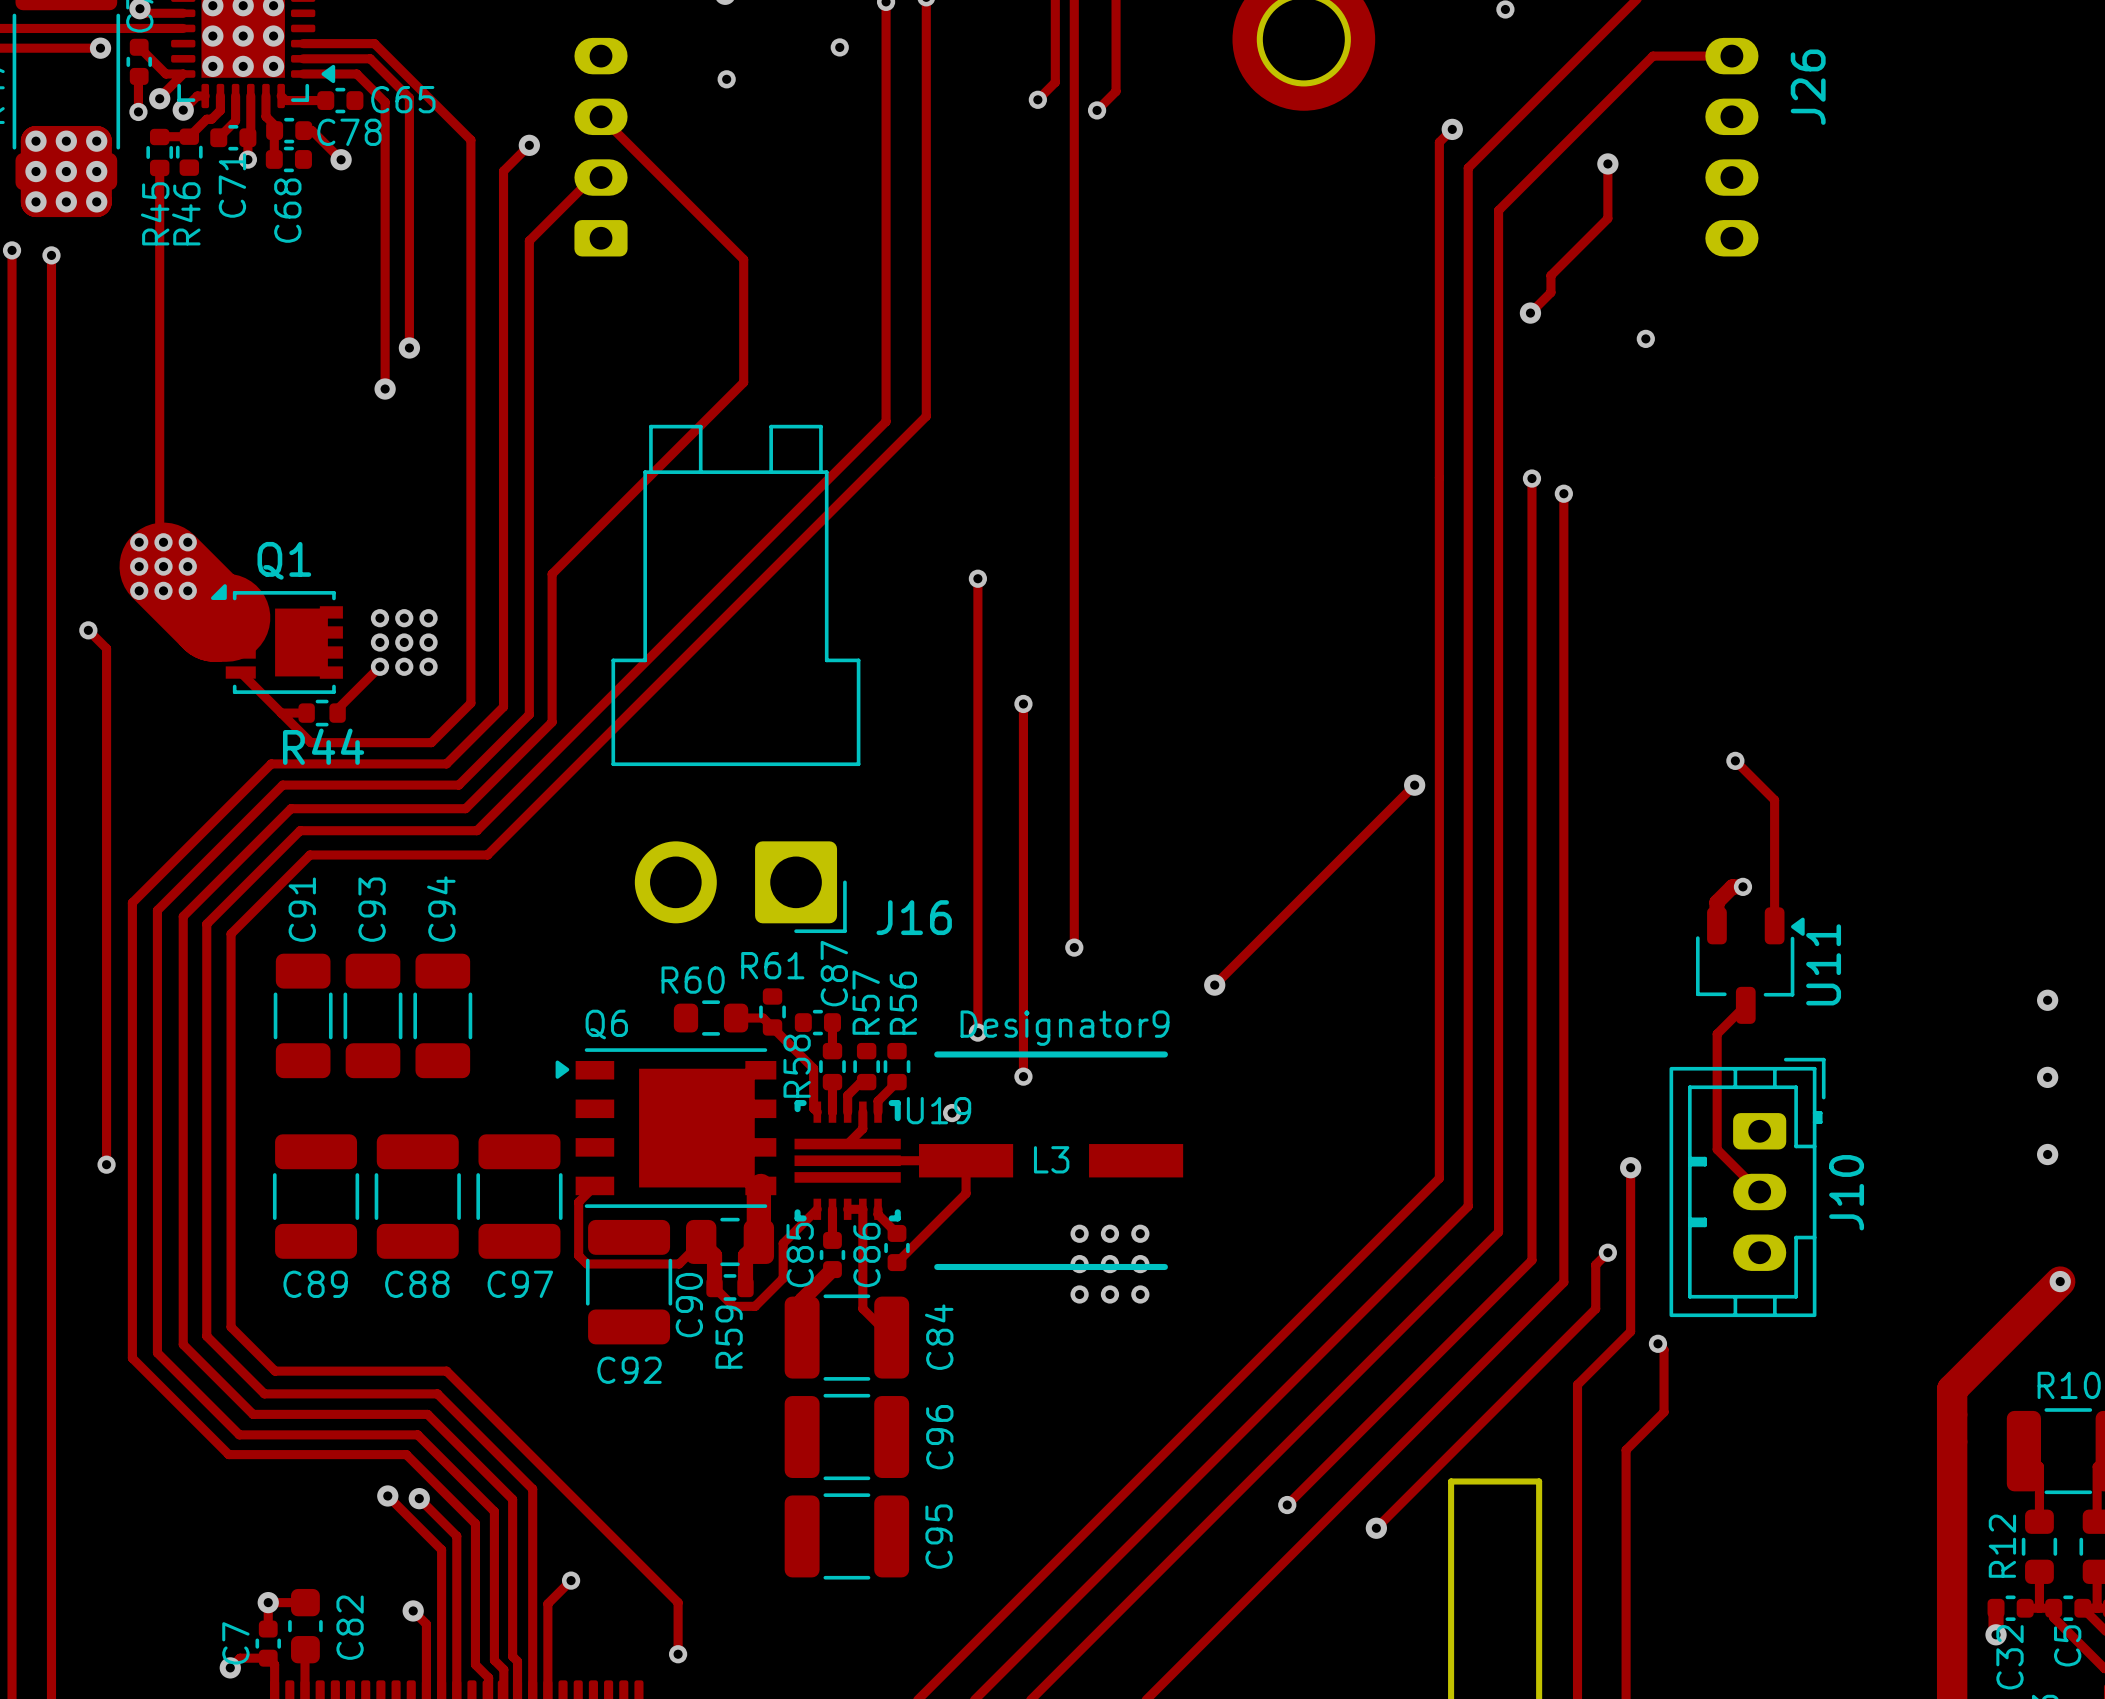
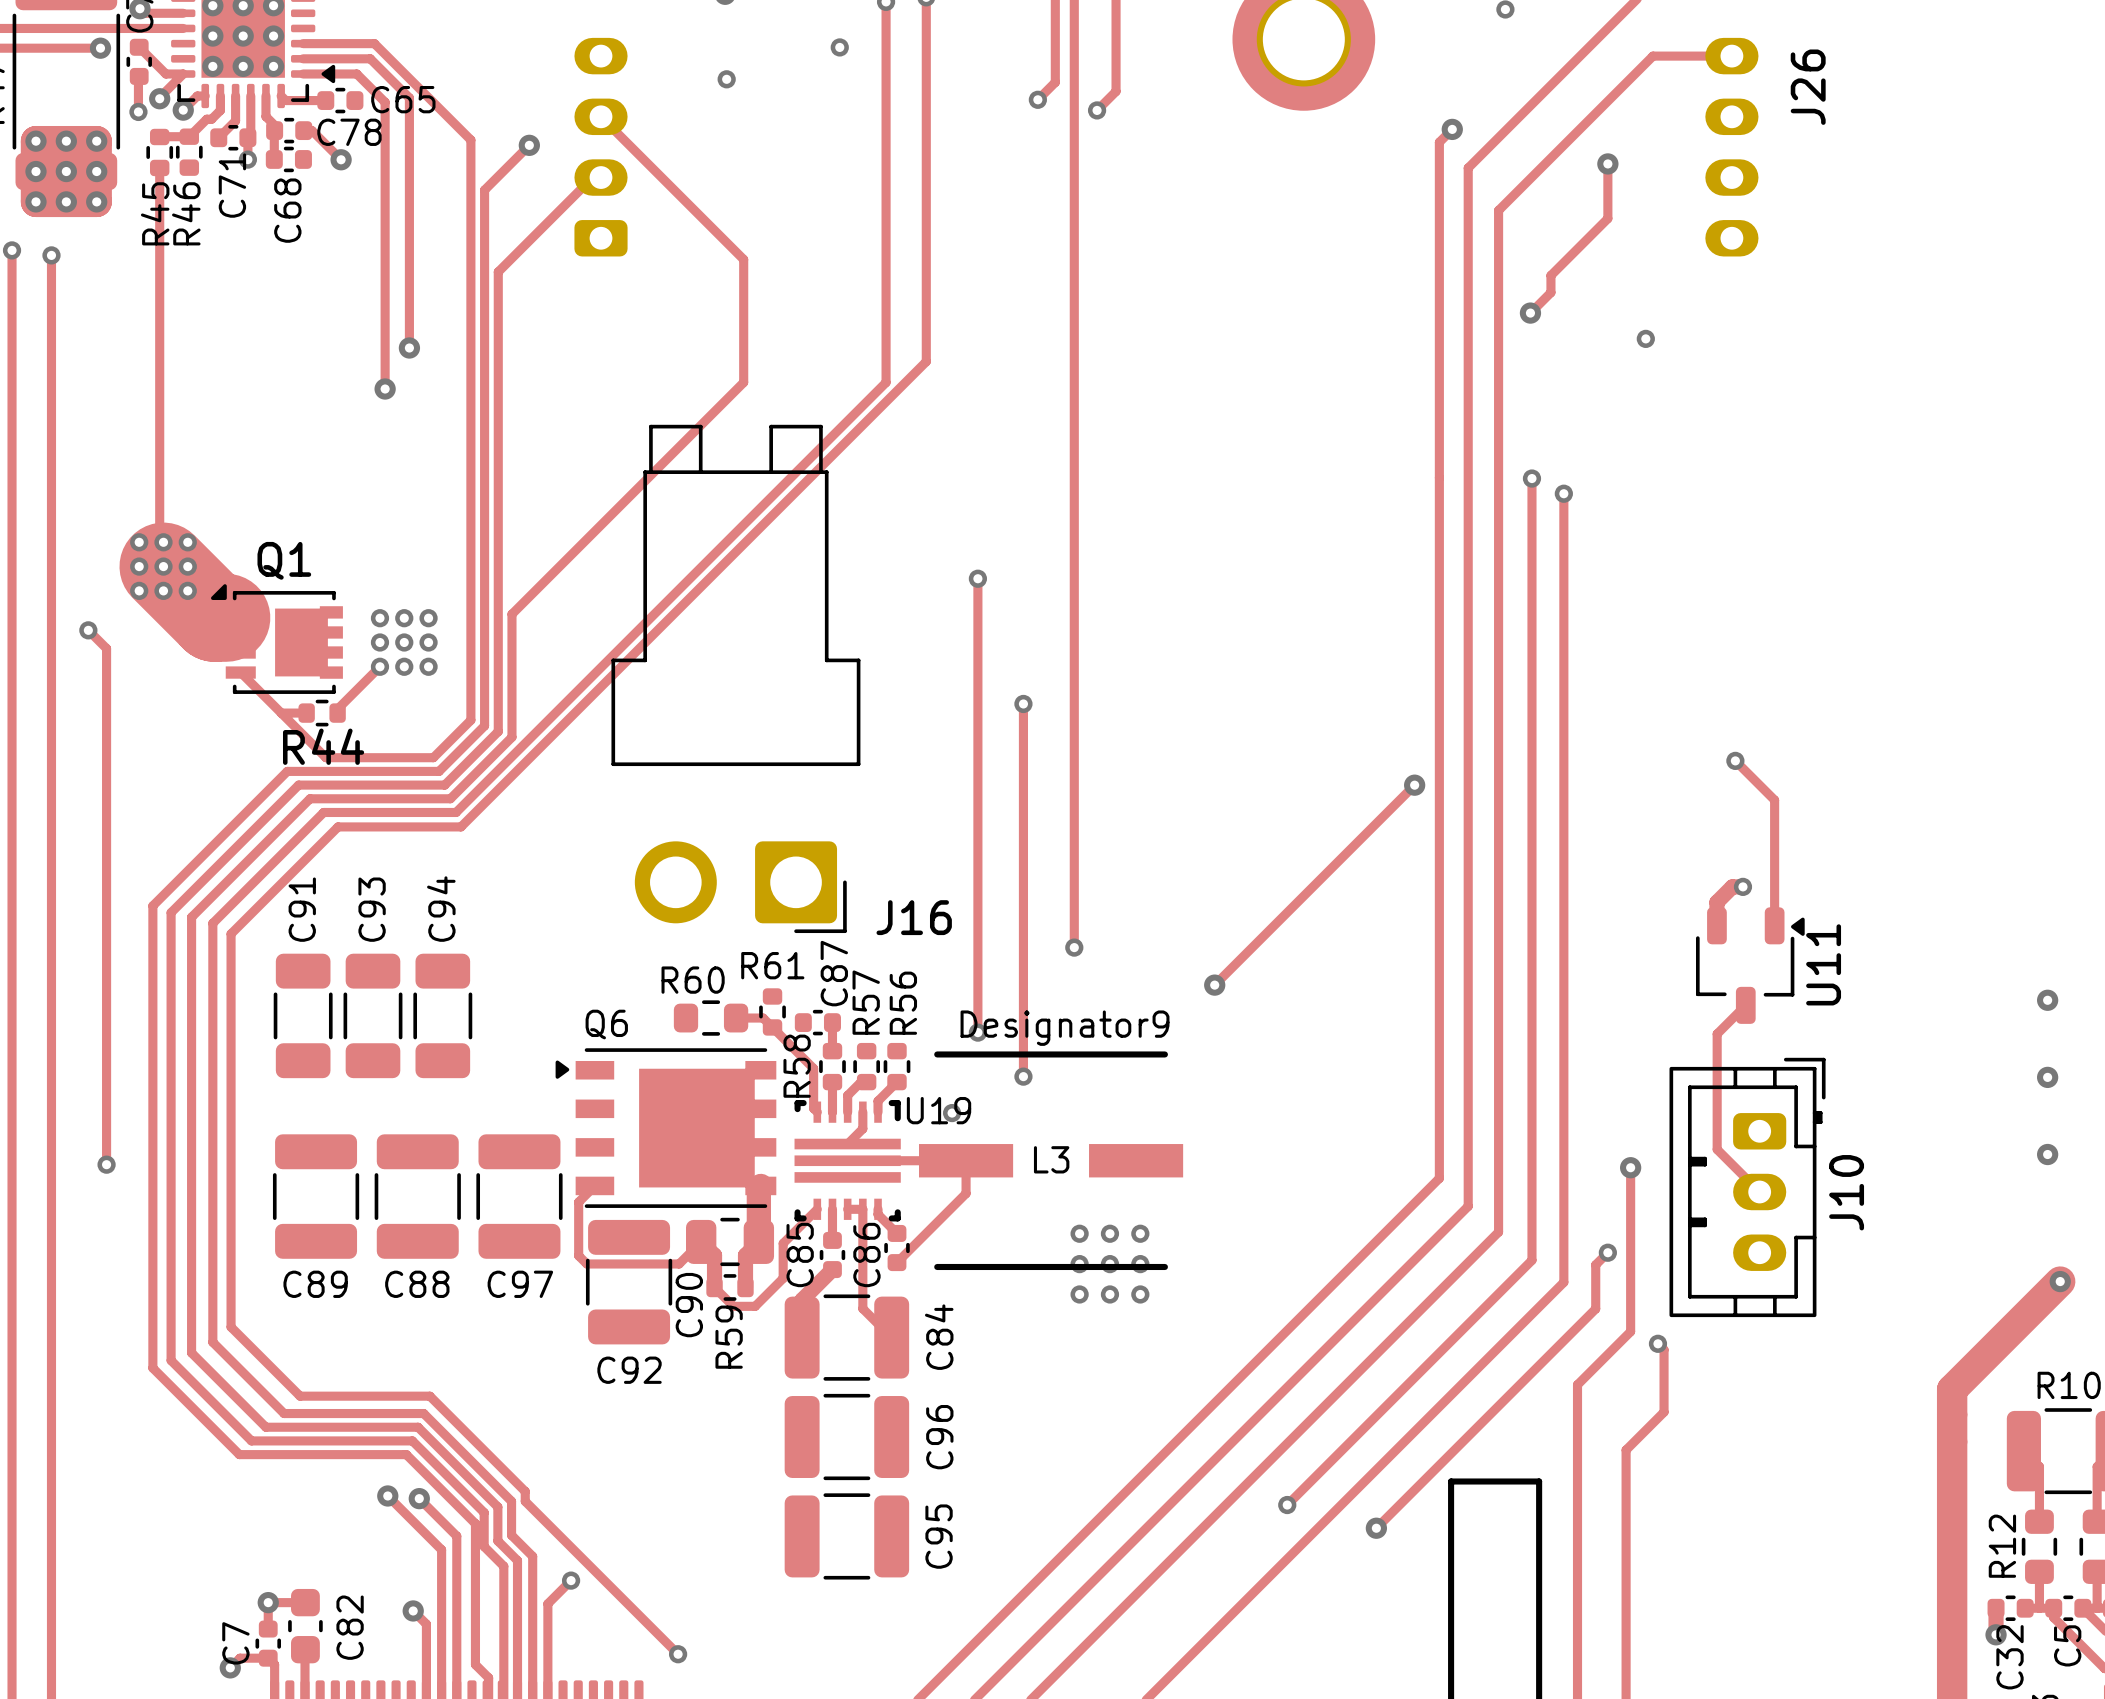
track: (503, 171) (503, 706) (484, 725) -> (503, 171) (484, 190) (484, 725)
track: (529, 240) (529, 714) (458, 785) (444, 785) -> (529, 240) (498, 271) (498, 731) (444, 785)
track: (926, 361) (926, 416) (487, 855) (309, 855) -> (926, 361) (461, 826) (338, 826) (309, 855)
track: (886, 382) (886, 421) (476, 830) (300, 830) (206, 924) (206, 1336) (212, 1342) -> (886, 382) (456, 812) (323, 812) (212, 923) (212, 1342)
track: (552, 574) (552, 722) (465, 808) (291, 808) (183, 916) (183, 1344) (191, 1352) -> (552, 574) (511, 614) (511, 737) (450, 798) (310, 798) (191, 917) (191, 1352)
track: (470, 703) (431, 742) (310, 742) -> (470, 703) (470, 720) (433, 757) (325, 757) (310, 742)
track: (446, 763) (271, 763) (132, 902) (132, 1358) (228, 1454) (239, 1454) -> (446, 763) (439, 771) (287, 771) (152, 905) (152, 1368) (239, 1454)
track: (298, 785) (282, 785) (157, 910) (157, 1352) (239, 1434) (417, 1434) (494, 1511) (494, 1660) (503, 1669) -> (298, 785) (171, 912) (171, 1360) (251, 1440) (412, 1440) (484, 1512) (484, 1546) (503, 1566) (503, 1669)
track: (275, 1371) (446, 1371) (678, 1602) (678, 1654) -> (275, 1371) (300, 1396) (429, 1396) (525, 1491) (525, 1501) (678, 1654)
track: (264, 1393) (437, 1393) (532, 1489) (532, 1556) -> (264, 1393) (284, 1413) (423, 1413) (511, 1501) (511, 1535) (532, 1556)
track: (253, 1414) (427, 1414) (512, 1499) (512, 1656) (517, 1661) -> (253, 1414) (265, 1427) (418, 1427) (497, 1507) (497, 1540) (517, 1560) (517, 1661)

